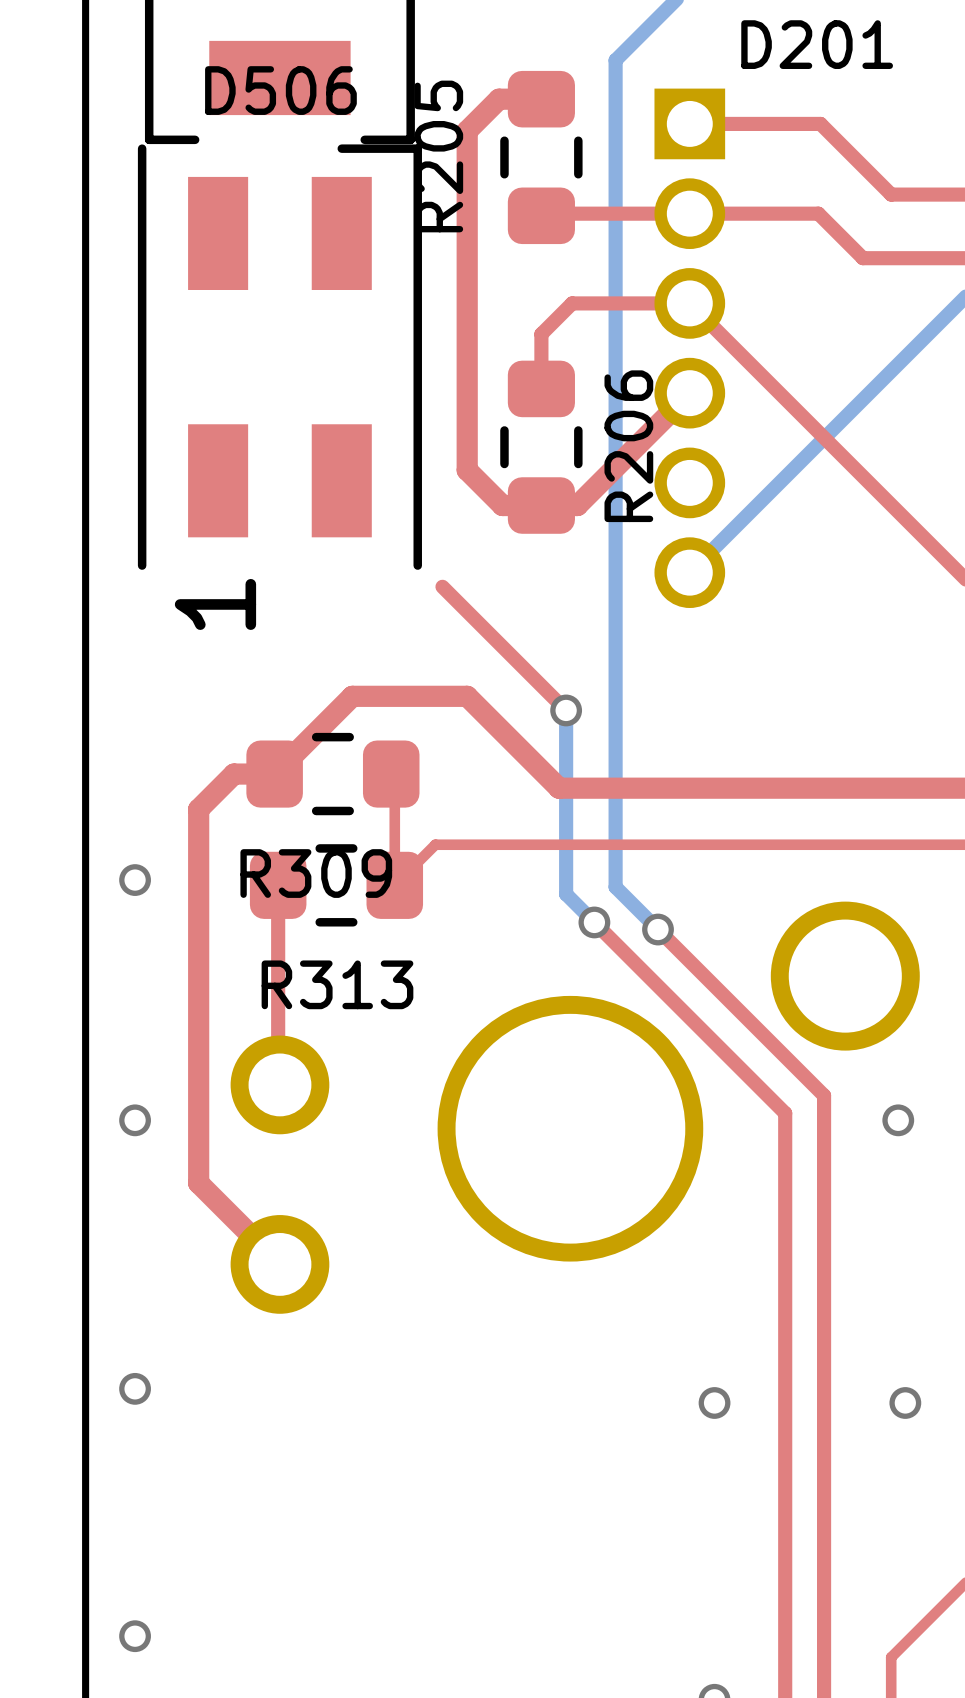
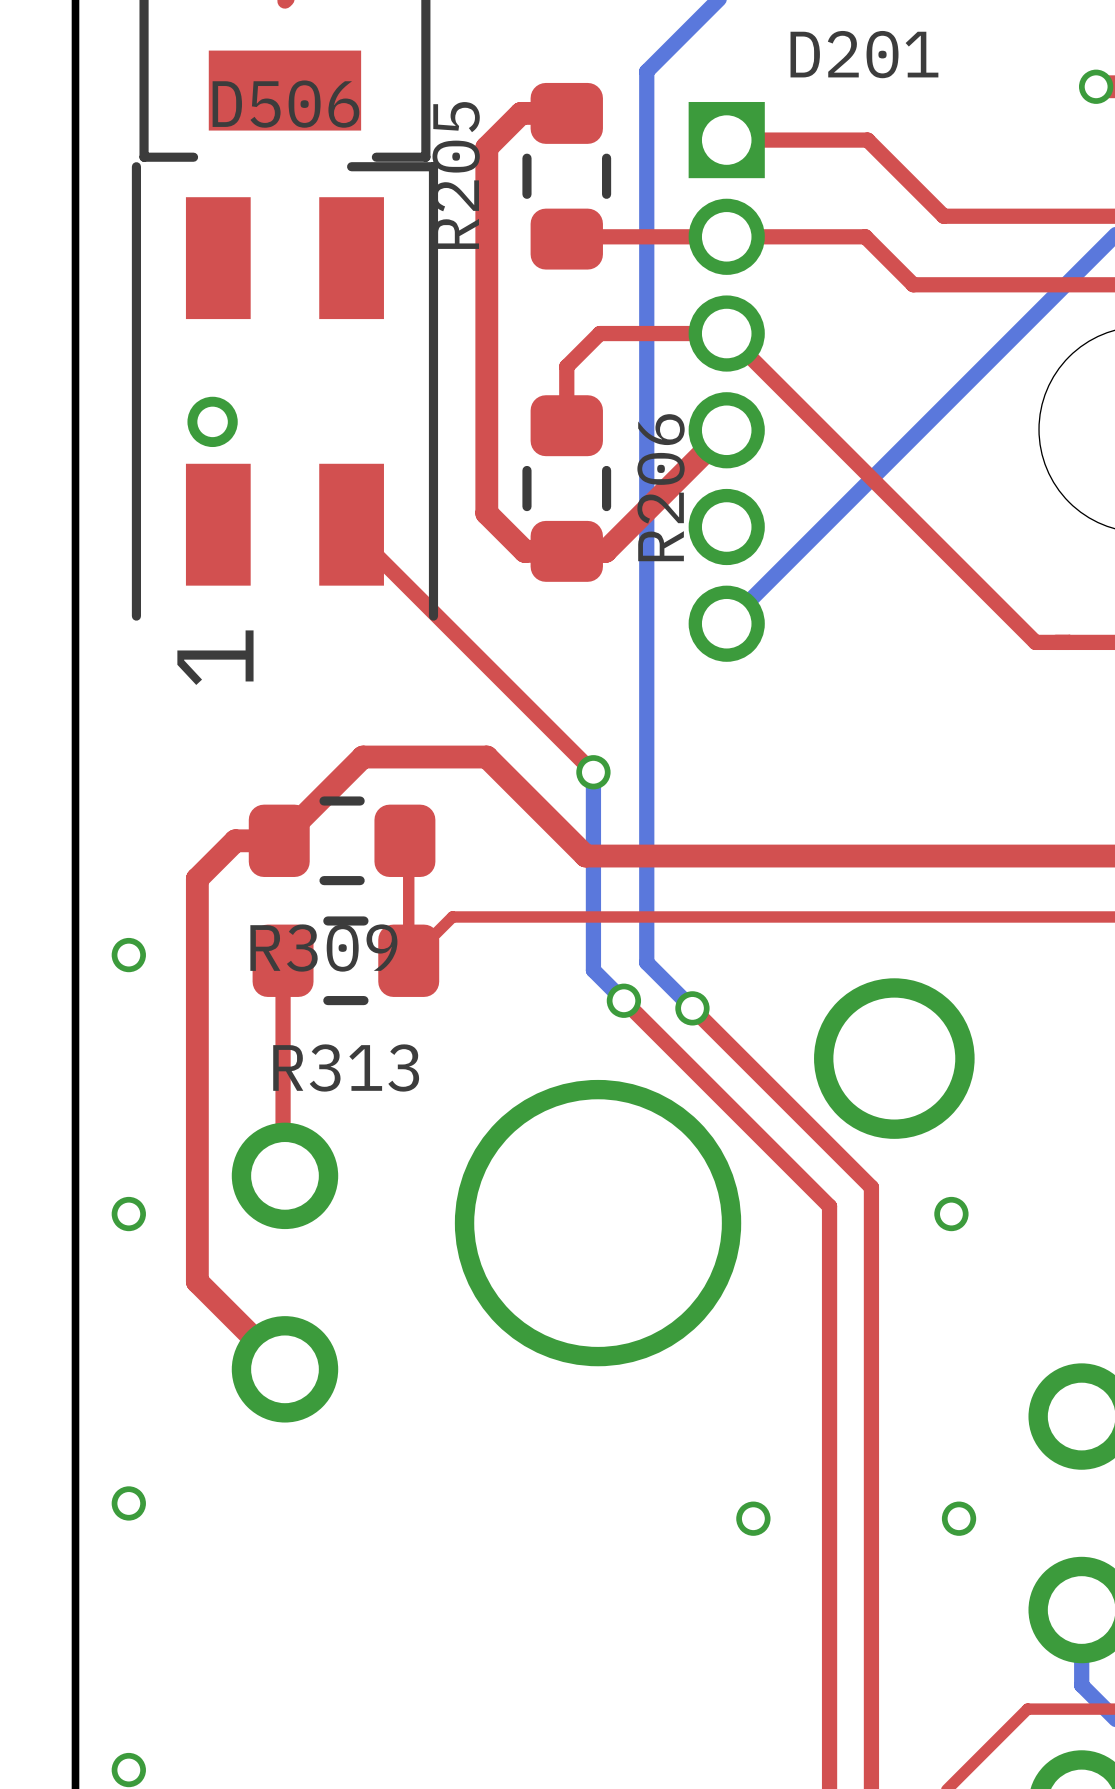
via: none -> (212, 421)
top track: none -> (351, 524) (351, 530) (460, 638)

